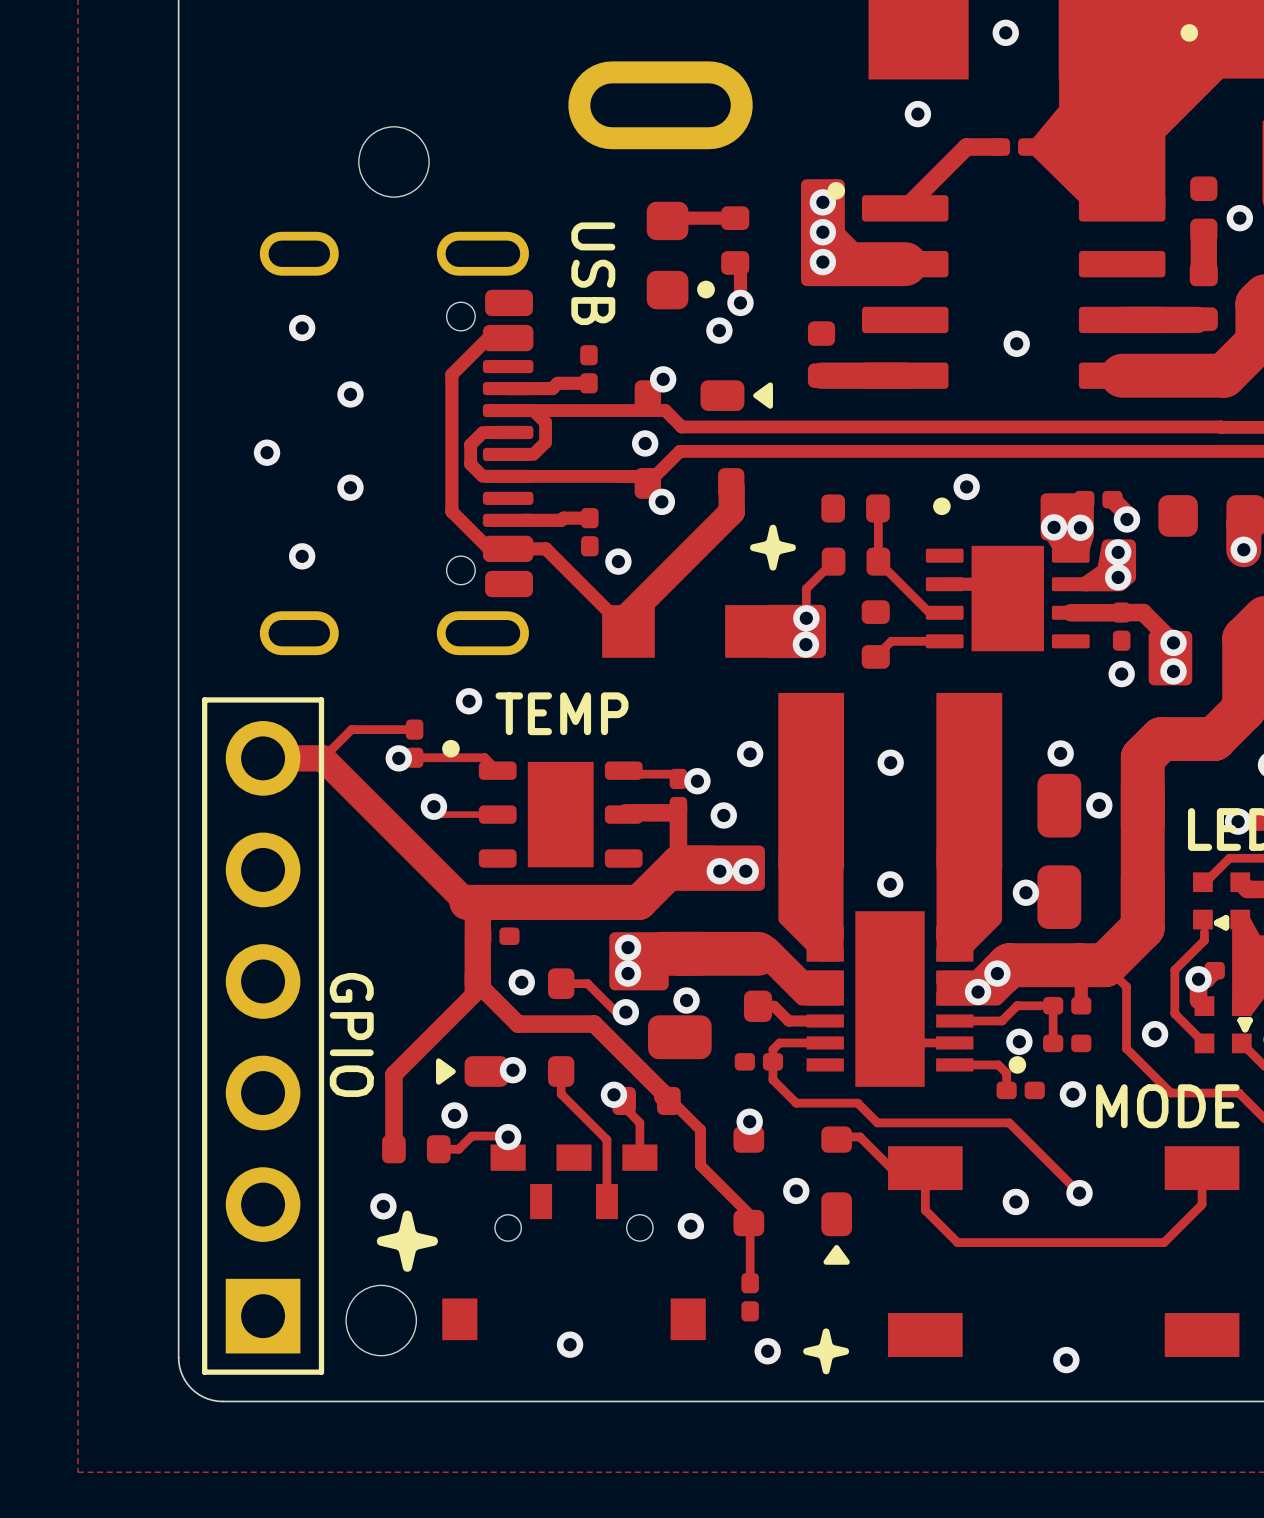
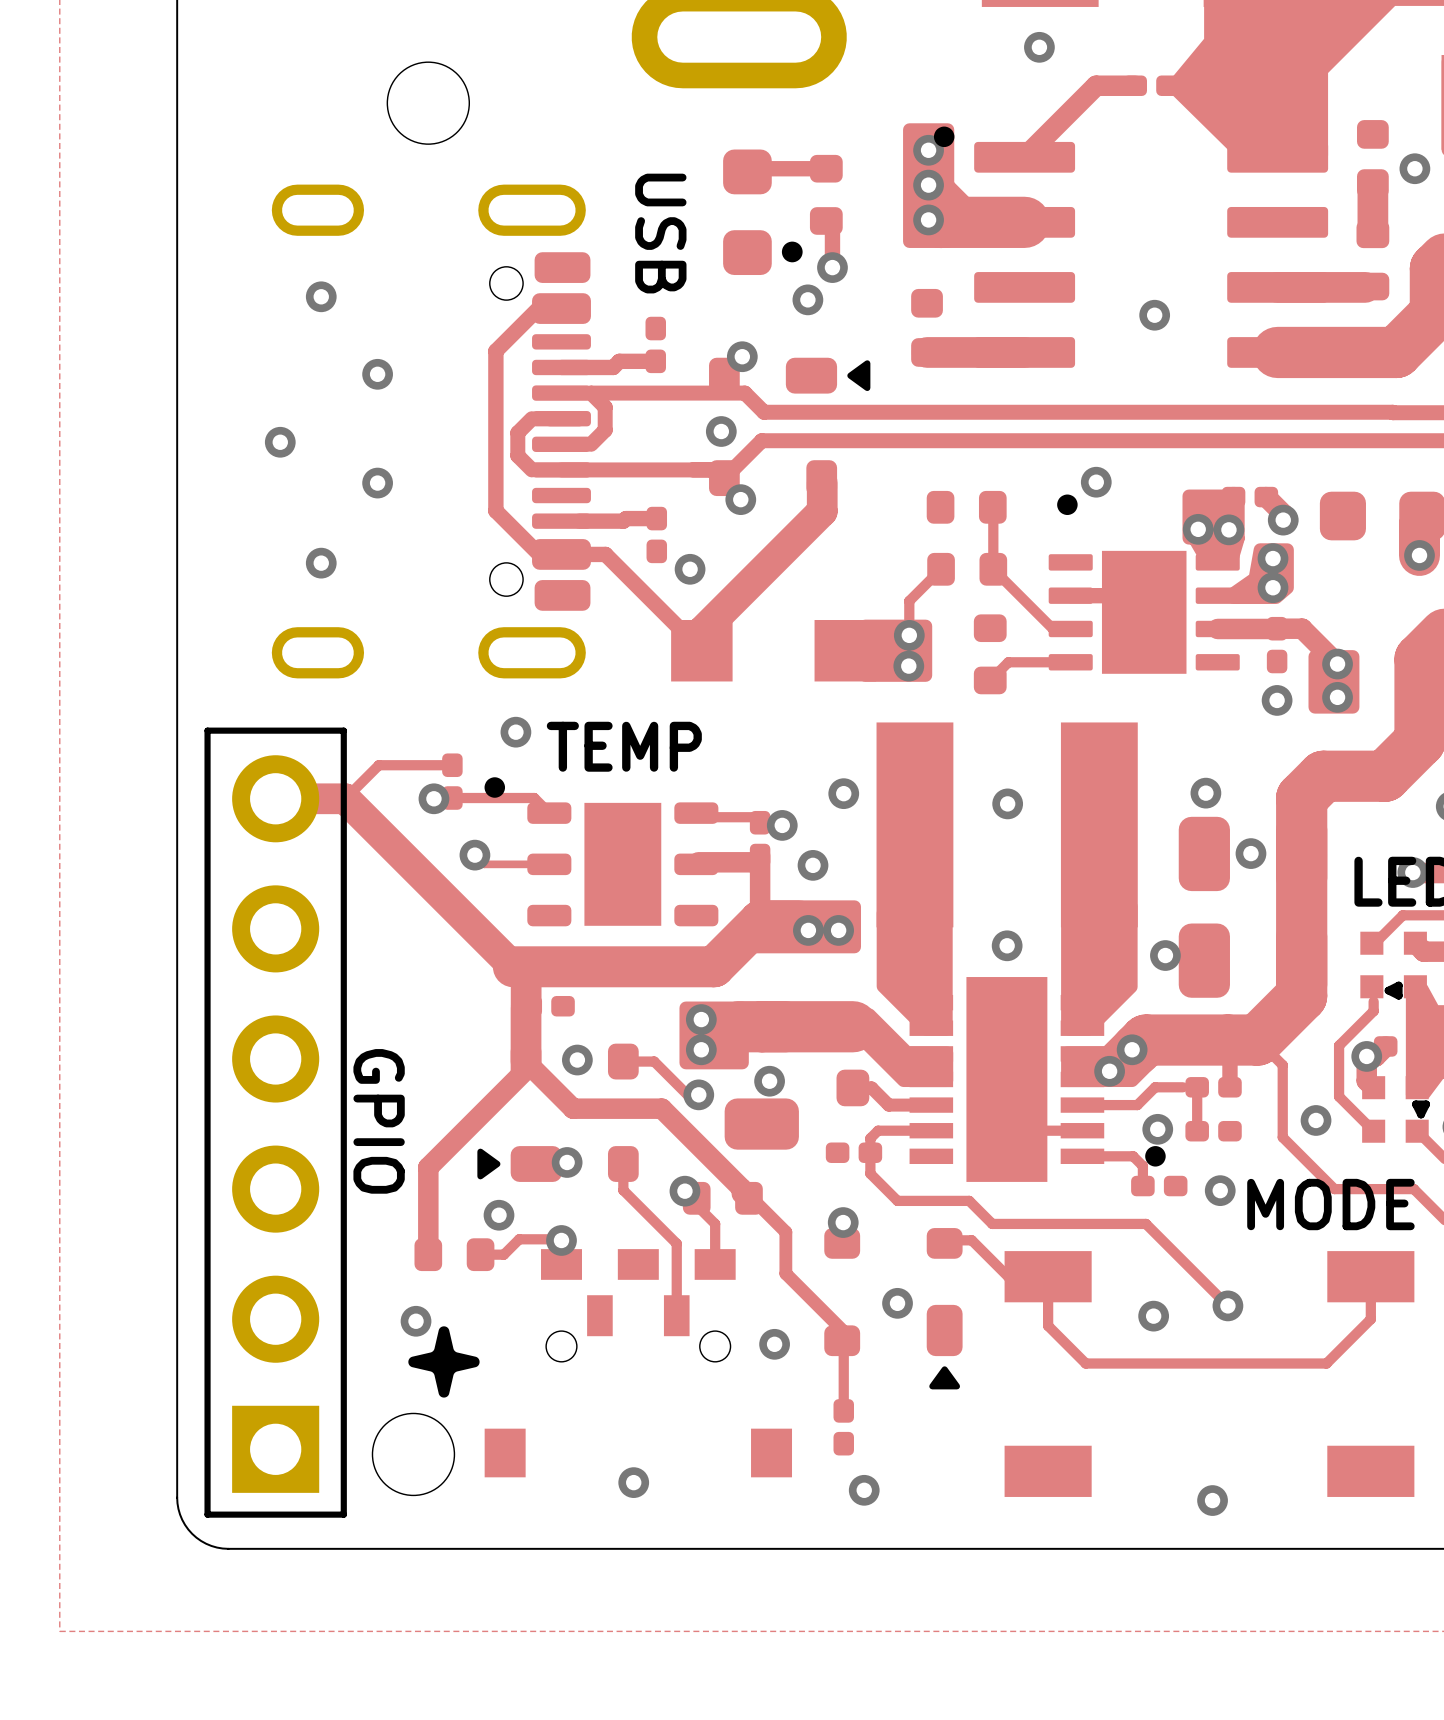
drawing: [750, 524, 796, 571] -> none
drawing: [803, 1328, 850, 1375] -> none

